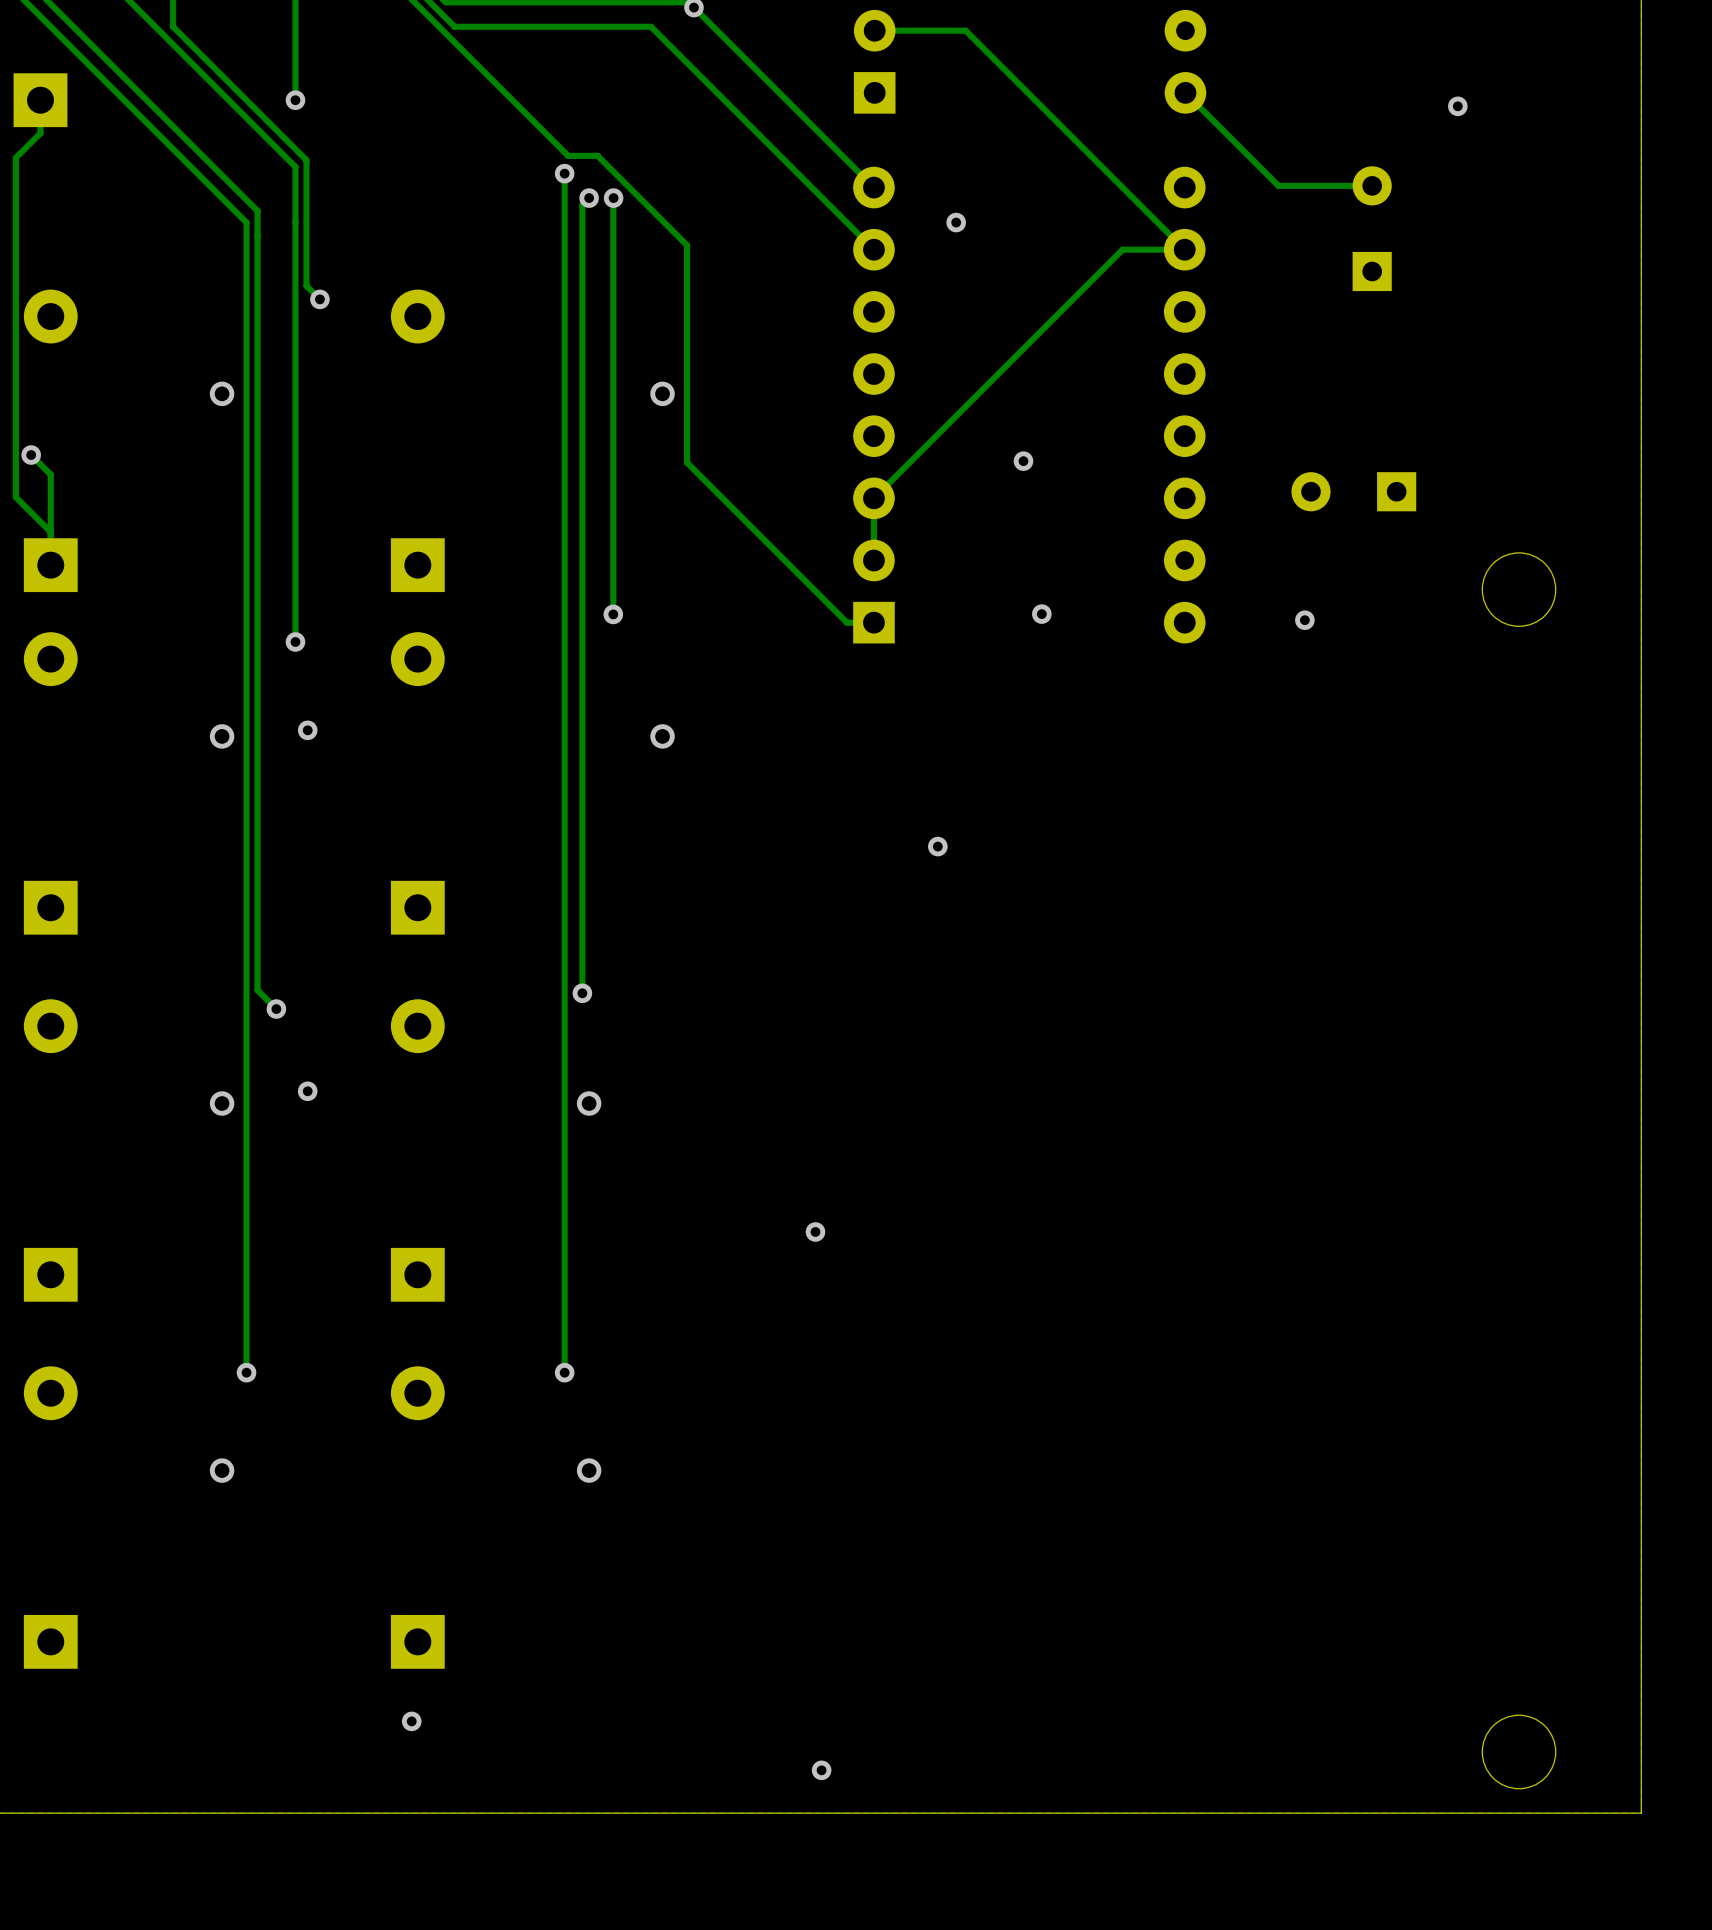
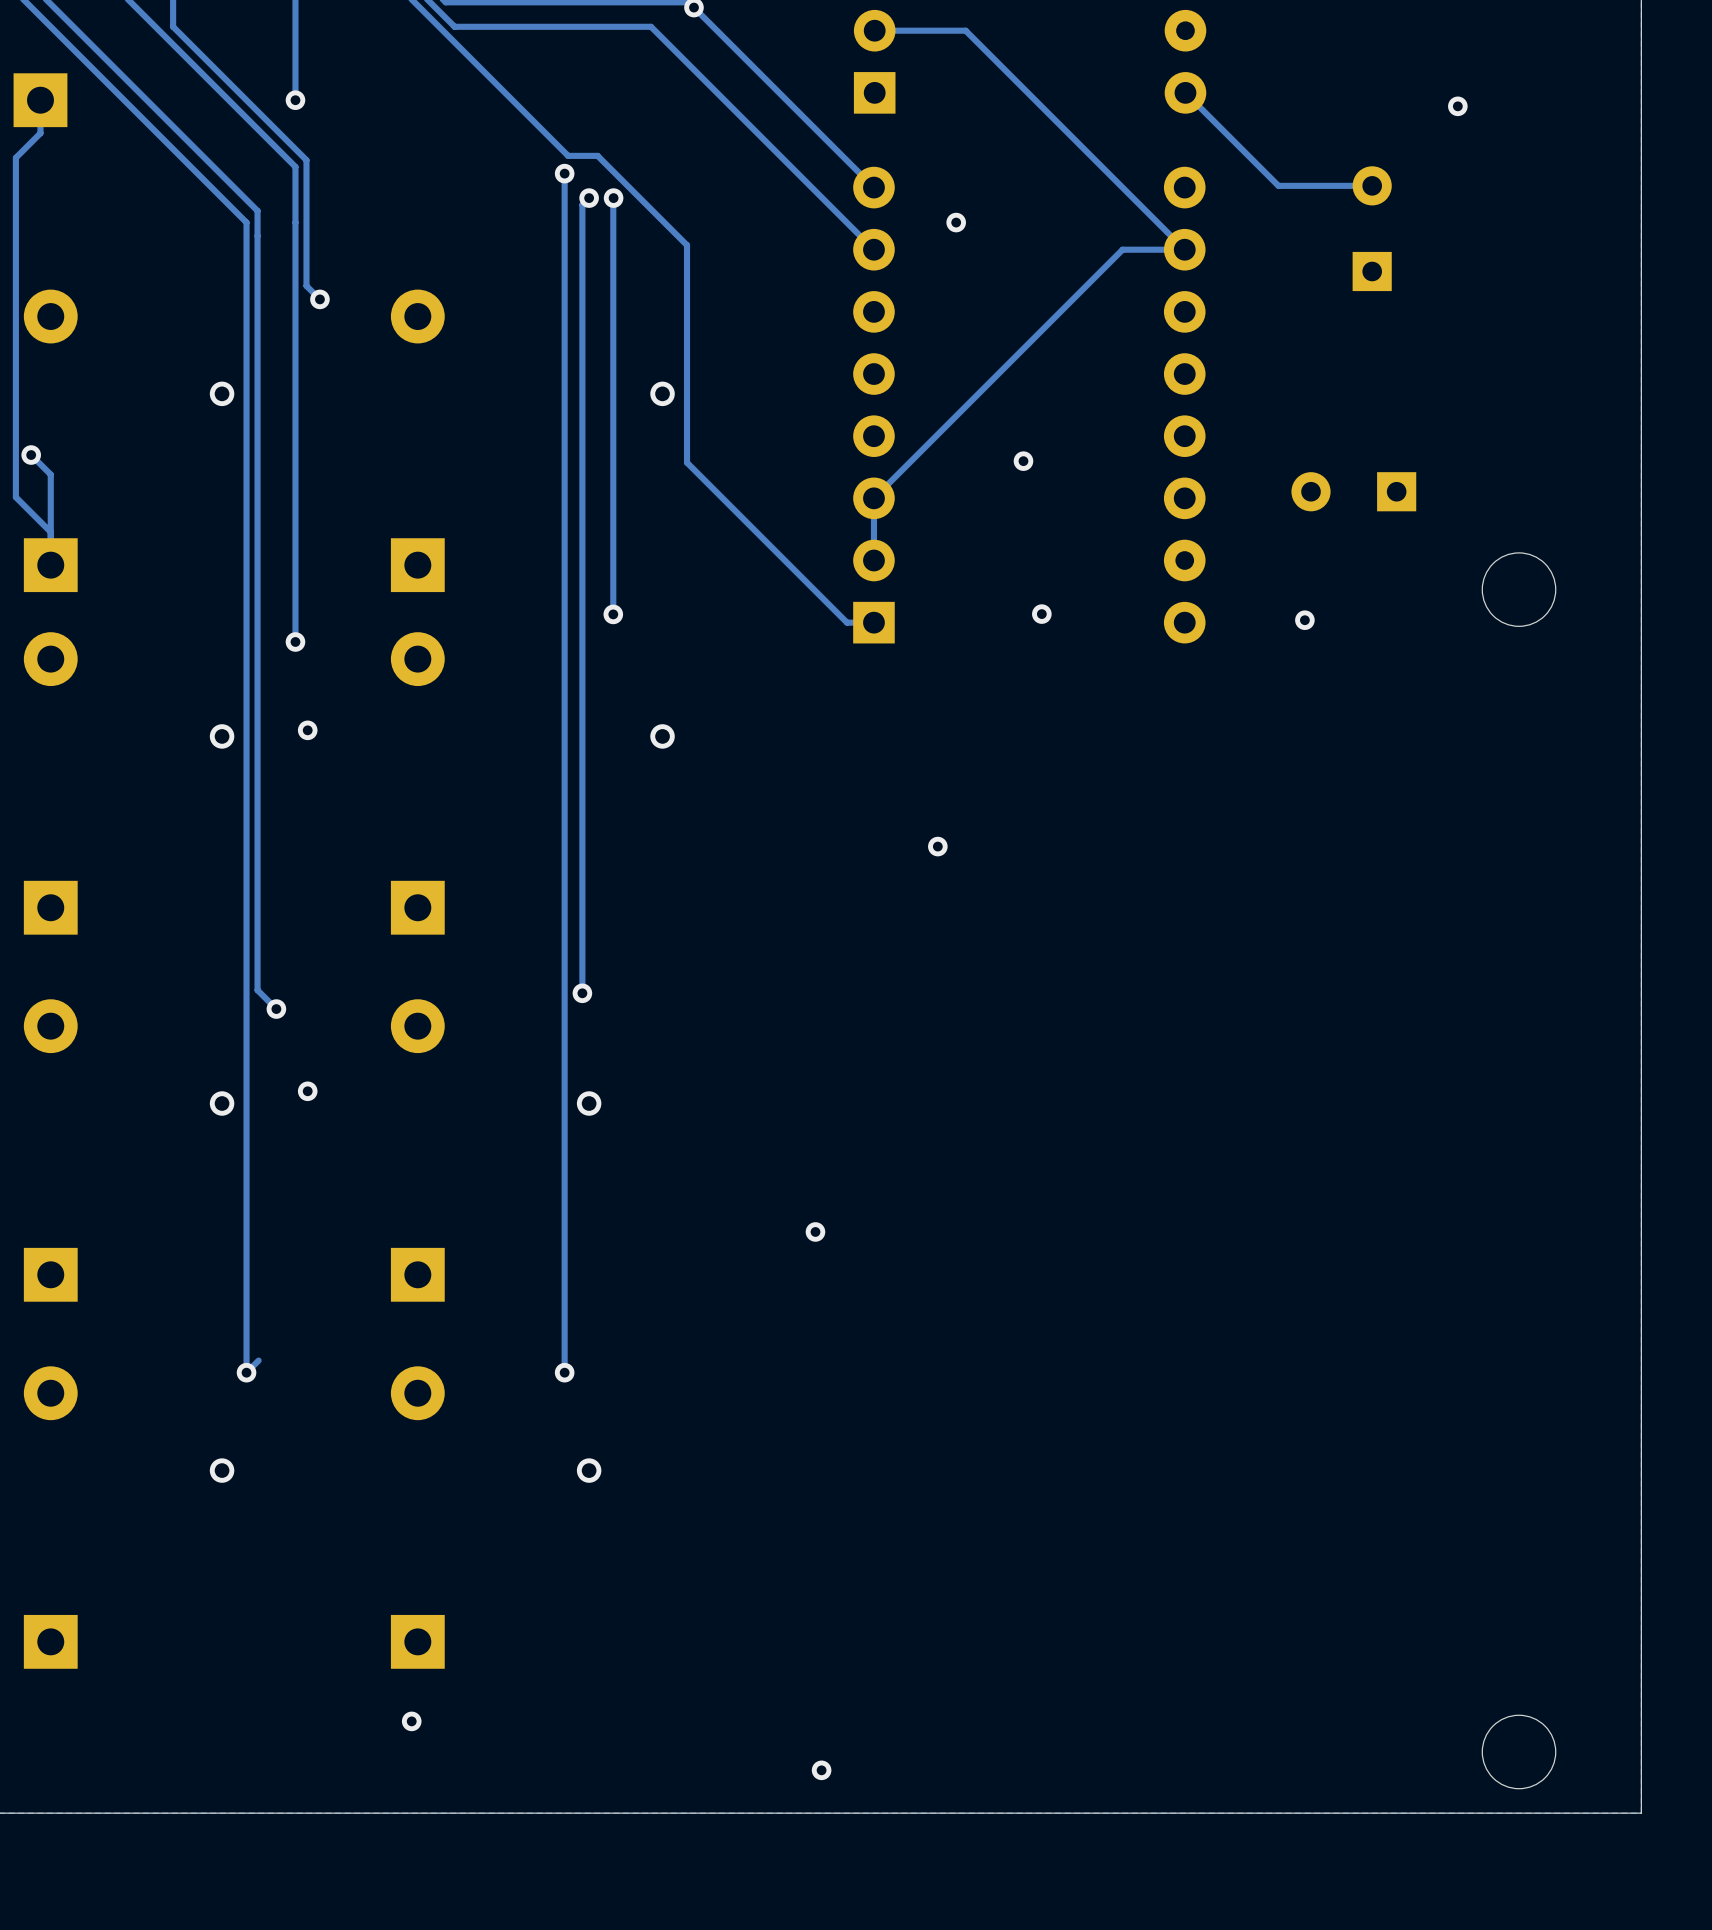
track: none -> (258, 1360) (246, 1372)

